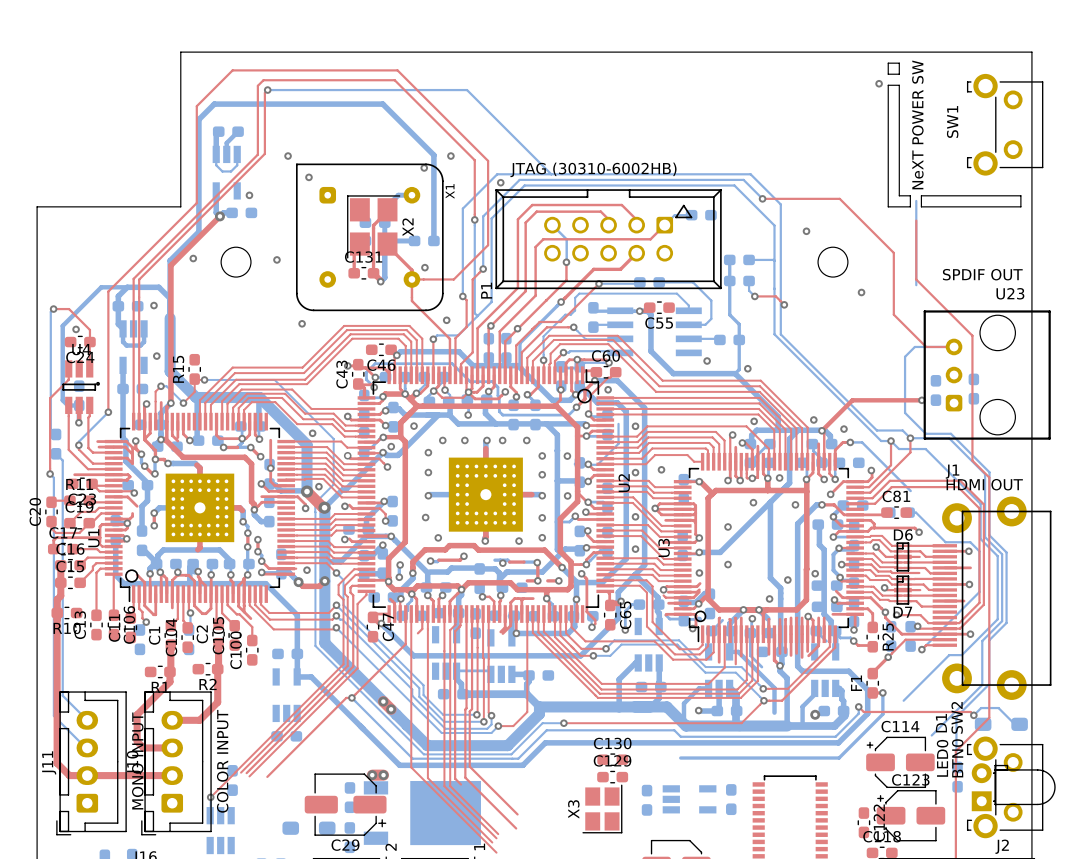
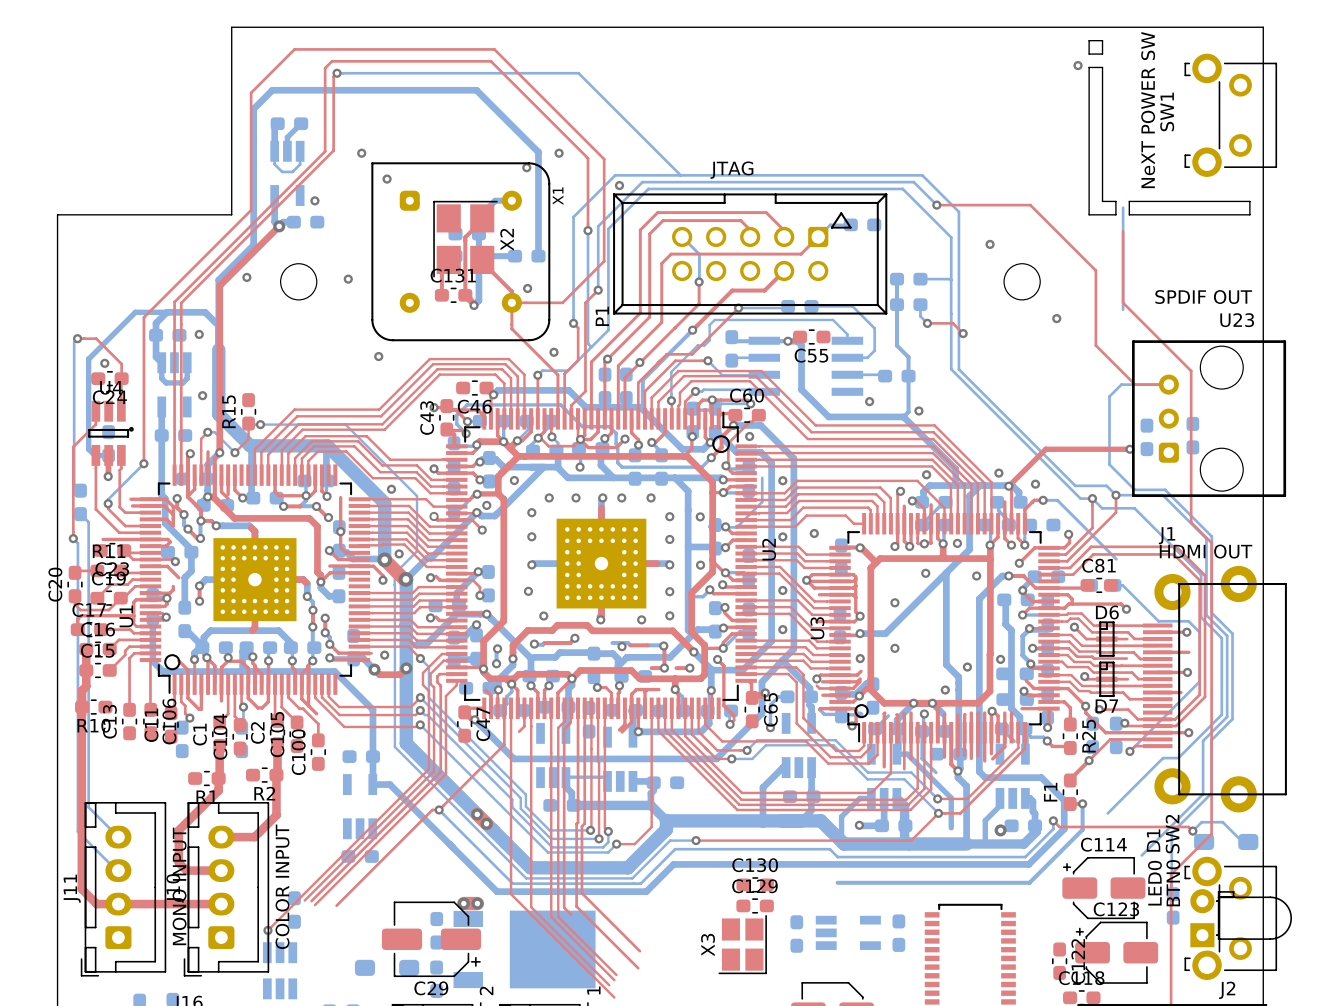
SW1 value: none -> NeXT POWER SW (1148, 110)
text: NeXT POWER SW (917, 124) -> none
P1 value: JTAG (30310-6002HB) (593, 169) -> JTAG (731, 170)

